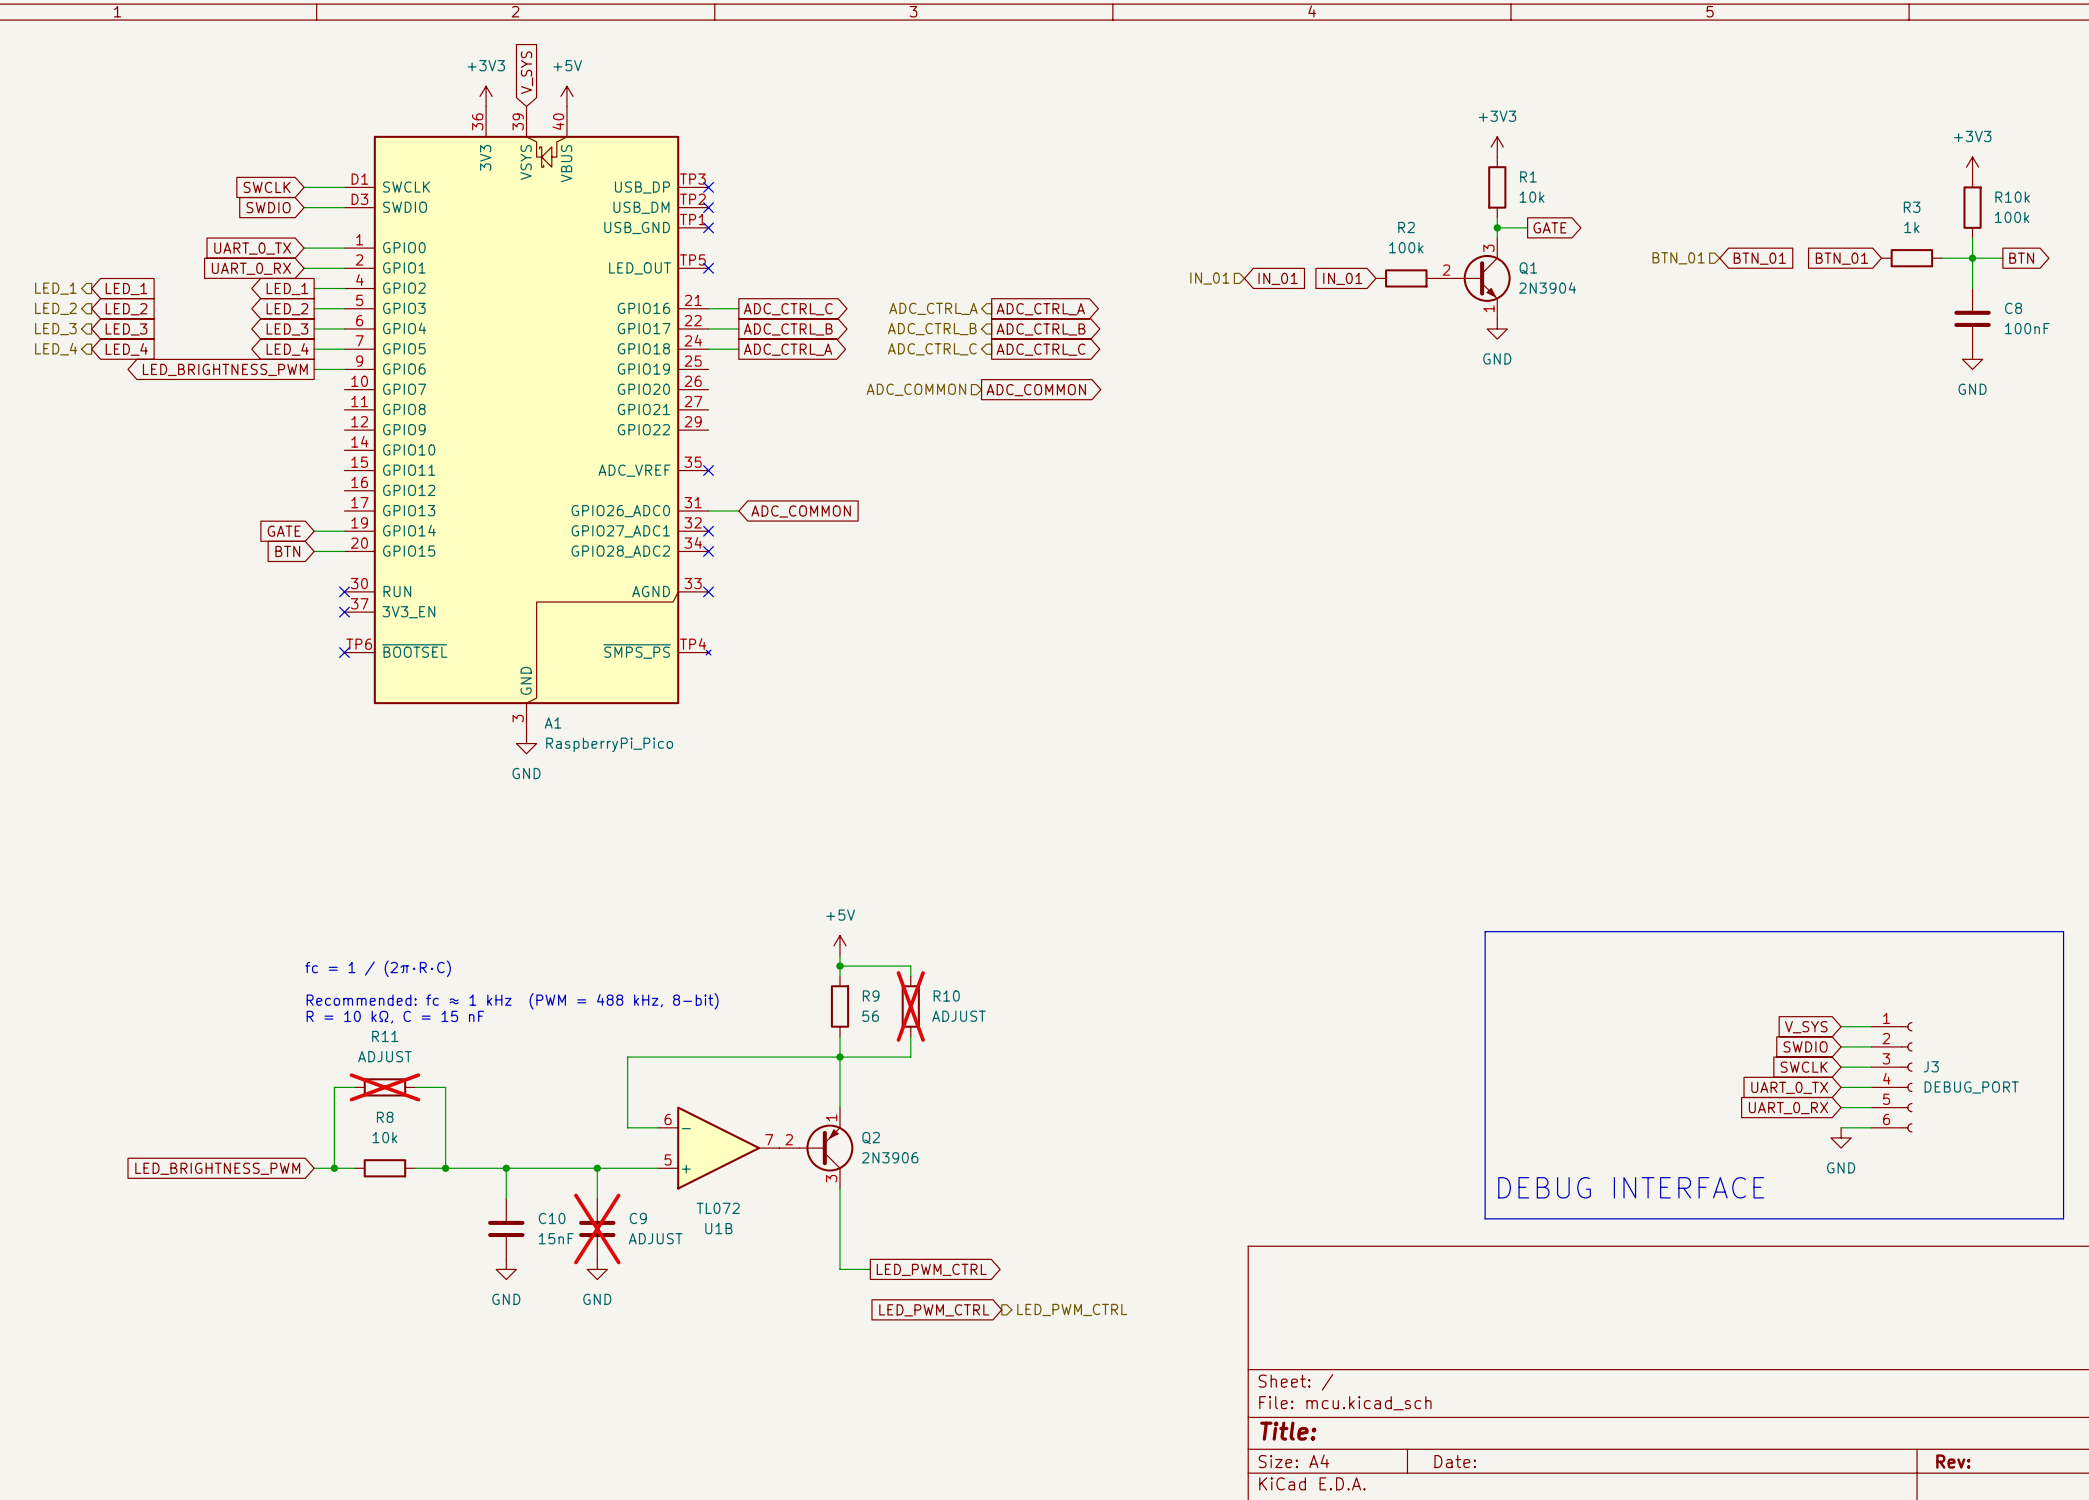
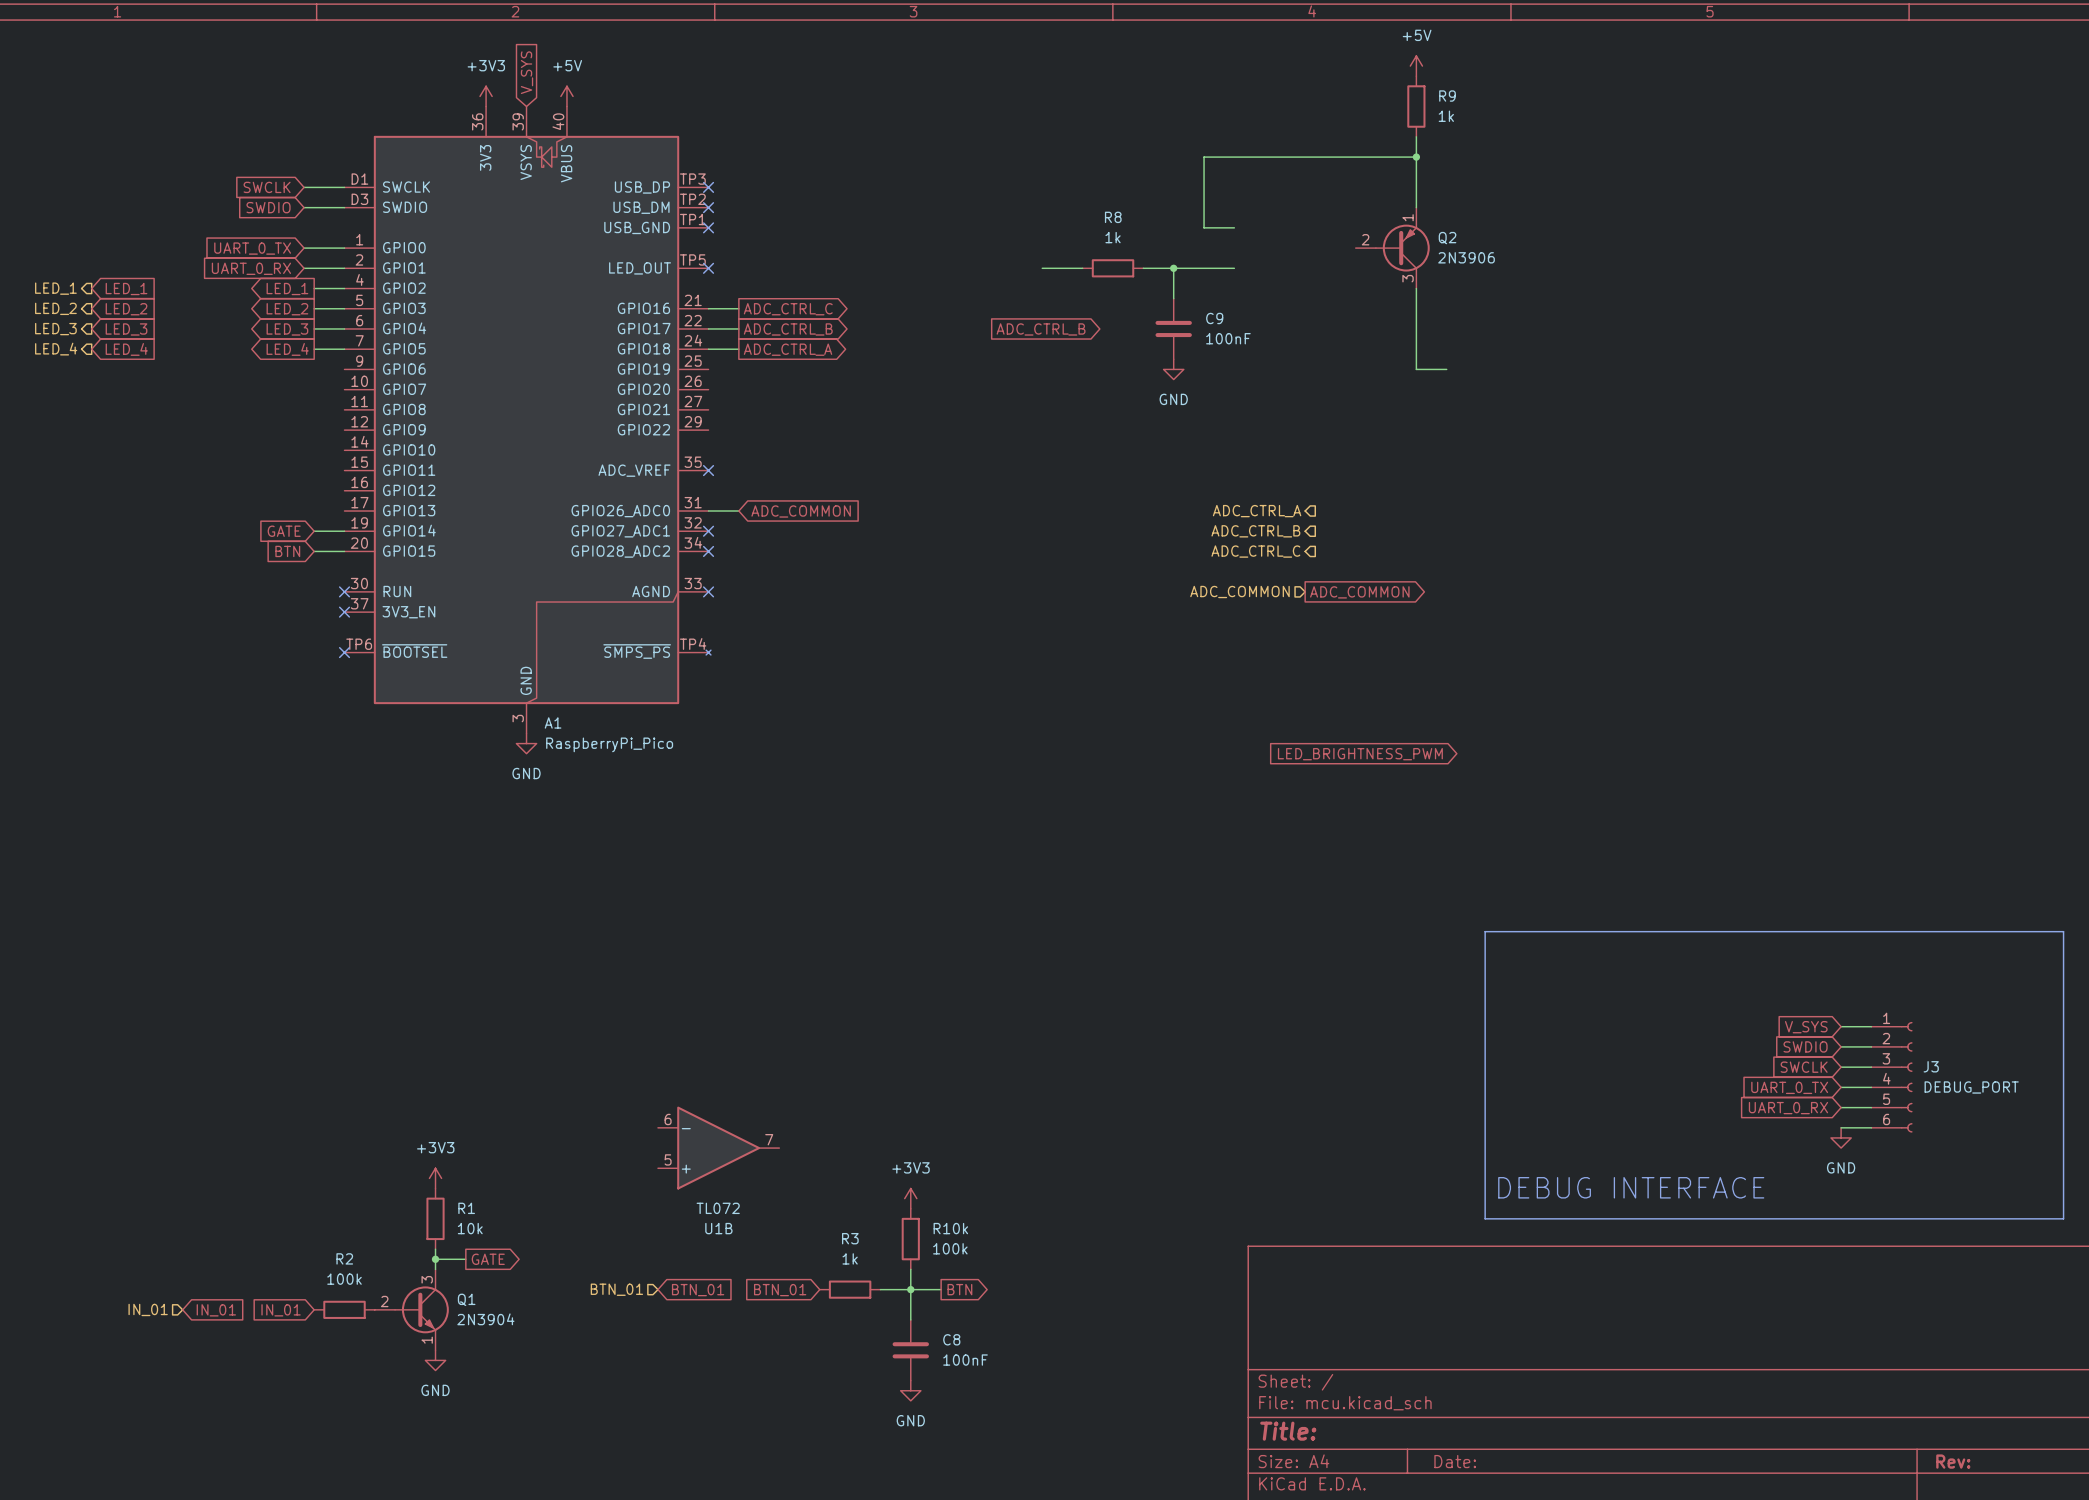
power symbol: none -> +5V (1416, 66)
wire: none -> (1416, 136) (1416, 207)
power symbol: +3V3 (1497, 146) -> none
wire: none -> (1416, 157) (1204, 157) (1204, 227) (1234, 227)
junction: none -> (1416, 157)
power symbol: +3V3 (1972, 167) -> none
R1 position: (1497, 187) -> (435, 1218)
R10k position: (1972, 207) -> (910, 1239)
wire: (1497, 217) (1497, 237) -> none
wire: (1497, 227) (1527, 227) -> none
junction: (1497, 227) -> none
global label: GATE (1550, 227) -> none
wire: (1972, 237) (1972, 288) -> none
hierarchical label: BTN_01 (1678, 258) -> none
global label: BTN_01 (1759, 258) -> none
global label: BTN_01 (1841, 258) -> none
R3 position: (1911, 258) -> (850, 1289)
wire: (1942, 258) (2002, 258) -> none
junction: (1972, 258) -> none
global label: BTN (2021, 258) -> none
wire: none -> (1042, 268) (1082, 268)
wire: none -> (1143, 268) (1234, 268)
wire: none -> (1173, 268) (1173, 298)
junction: none -> (1173, 268)
hierarchical label: IN_01 (1209, 278) -> none
global label: IN_01 (1278, 278) -> none
global label: IN_01 (1342, 278) -> none
R2 position: (1406, 278) -> (344, 1309)
Q1 position: (1473, 278) -> (411, 1309)
wire: none -> (1416, 288) (1416, 369) (1446, 369)
hierarchical label: ADC_CTRL_A (933, 308) -> none
global label: ADC_CTRL_A (1040, 309) -> none
C8 position: (1972, 318) -> (910, 1350)
power symbol: GND (1497, 328) -> none
hierarchical label: ADC_CTRL_B (932, 329) -> none
hierarchical label: ADC_CTRL_C (932, 349) -> none
global label: ADC_CTRL_C (1041, 349) -> none
power symbol: GND (1972, 359) -> none
global label: LED_BRIGHTNESS_PWM (225, 369) -> none
wire: (314, 369) (344, 369) -> none
power symbol: none -> GND (1173, 369)
hierarchical label: ADC_COMMON (916, 389) -> none
global label: ADC_COMMON (1036, 390) -> none
hierarchical label: none -> ADC_CTRL_A (1257, 511)
hierarchical label: none -> ADC_CTRL_B (1255, 531)
hierarchical label: none -> ADC_CTRL_C (1255, 551)
hierarchical label: none -> ADC_COMMON (1239, 592)
global label: none -> ADC_COMMON (1359, 592)
global label: none -> LED_BRIGHTNESS_PWM (1360, 754)
power symbol: +5V (839, 945) -> none
wire: (839, 955) (839, 976) -> none
wire: (839, 966) (910, 966) (910, 976) -> none
junction: (839, 966) -> none
text: fc = 1 / (2π·R·C) (378, 968) -> none
text: Recommended: fc ≈ 1 kHz (PWM = 488 kHz, 8-bit) (512, 1001) -> none
R9 position: (839, 1006) -> (1416, 106)
R10: ADJUST (910, 1006) -> none
R9 value: 56 (870, 1016) -> 1k (1446, 116)
text: R = 10 kΩ, C = 15 nF (395, 1017) -> none
wire: (839, 1036) (839, 1107) -> none
wire: (910, 1036) (910, 1057) (627, 1057) (627, 1127) (657, 1127) -> none
junction: (839, 1057) -> none
wire: (354, 1087) (334, 1087) (334, 1168) -> none
R11: ADJUST (384, 1087) -> none
wire: (415, 1087) (445, 1087) (445, 1168) -> none
R8 value: 10k (384, 1137) -> 1k (1113, 237)
Q2 position: (816, 1148) -> (1392, 248)
global label: LED_BRIGHTNESS_PWM (217, 1168) -> none
wire: (314, 1168) (354, 1168) -> none
junction: (334, 1168) -> none
R8 position: (384, 1168) -> (1113, 268)
wire: (415, 1168) (657, 1168) -> none
junction: (445, 1168) -> none
wire: (506, 1168) (506, 1198) -> none
junction: (506, 1168) -> none
wire: (597, 1168) (597, 1198) -> none
junction: (597, 1168) -> none
power symbol: none -> +3V3 (435, 1178)
wire: (839, 1188) (839, 1269) (870, 1269) -> none
power symbol: none -> +3V3 (910, 1198)
C10: 15nF (506, 1228) -> none
C9 position: (597, 1228) -> (1173, 328)
C9 do-not-place cross: (597, 1228) -> none
C9 value: ADJUST (655, 1238) -> 100nF (1228, 338)
wire: none -> (435, 1249) (435, 1269)
wire: none -> (435, 1259) (465, 1259)
junction: none -> (435, 1259)
global label: none -> GATE (488, 1259)
power symbol: GND (506, 1269) -> none
power symbol: GND (597, 1269) -> none
wire: none -> (910, 1269) (910, 1319)
global label: LED_PWM_CTRL (931, 1269) -> none
hierarchical label: none -> BTN_01 (616, 1289)
wire: none -> (880, 1289) (941, 1289)
junction: none -> (910, 1289)
global label: none -> BTN (959, 1289)
global label: none -> BTN_01 (698, 1290)
global label: none -> BTN_01 (780, 1290)
hierarchical label: none -> IN_01 (148, 1309)
hierarchical label: LED_PWM_CTRL (1072, 1309) -> none
global label: none -> IN_01 (216, 1310)
global label: none -> IN_01 (281, 1310)
global label: LED_PWM_CTRL (934, 1310) -> none
power symbol: none -> GND (435, 1360)
power symbol: none -> GND (910, 1390)

